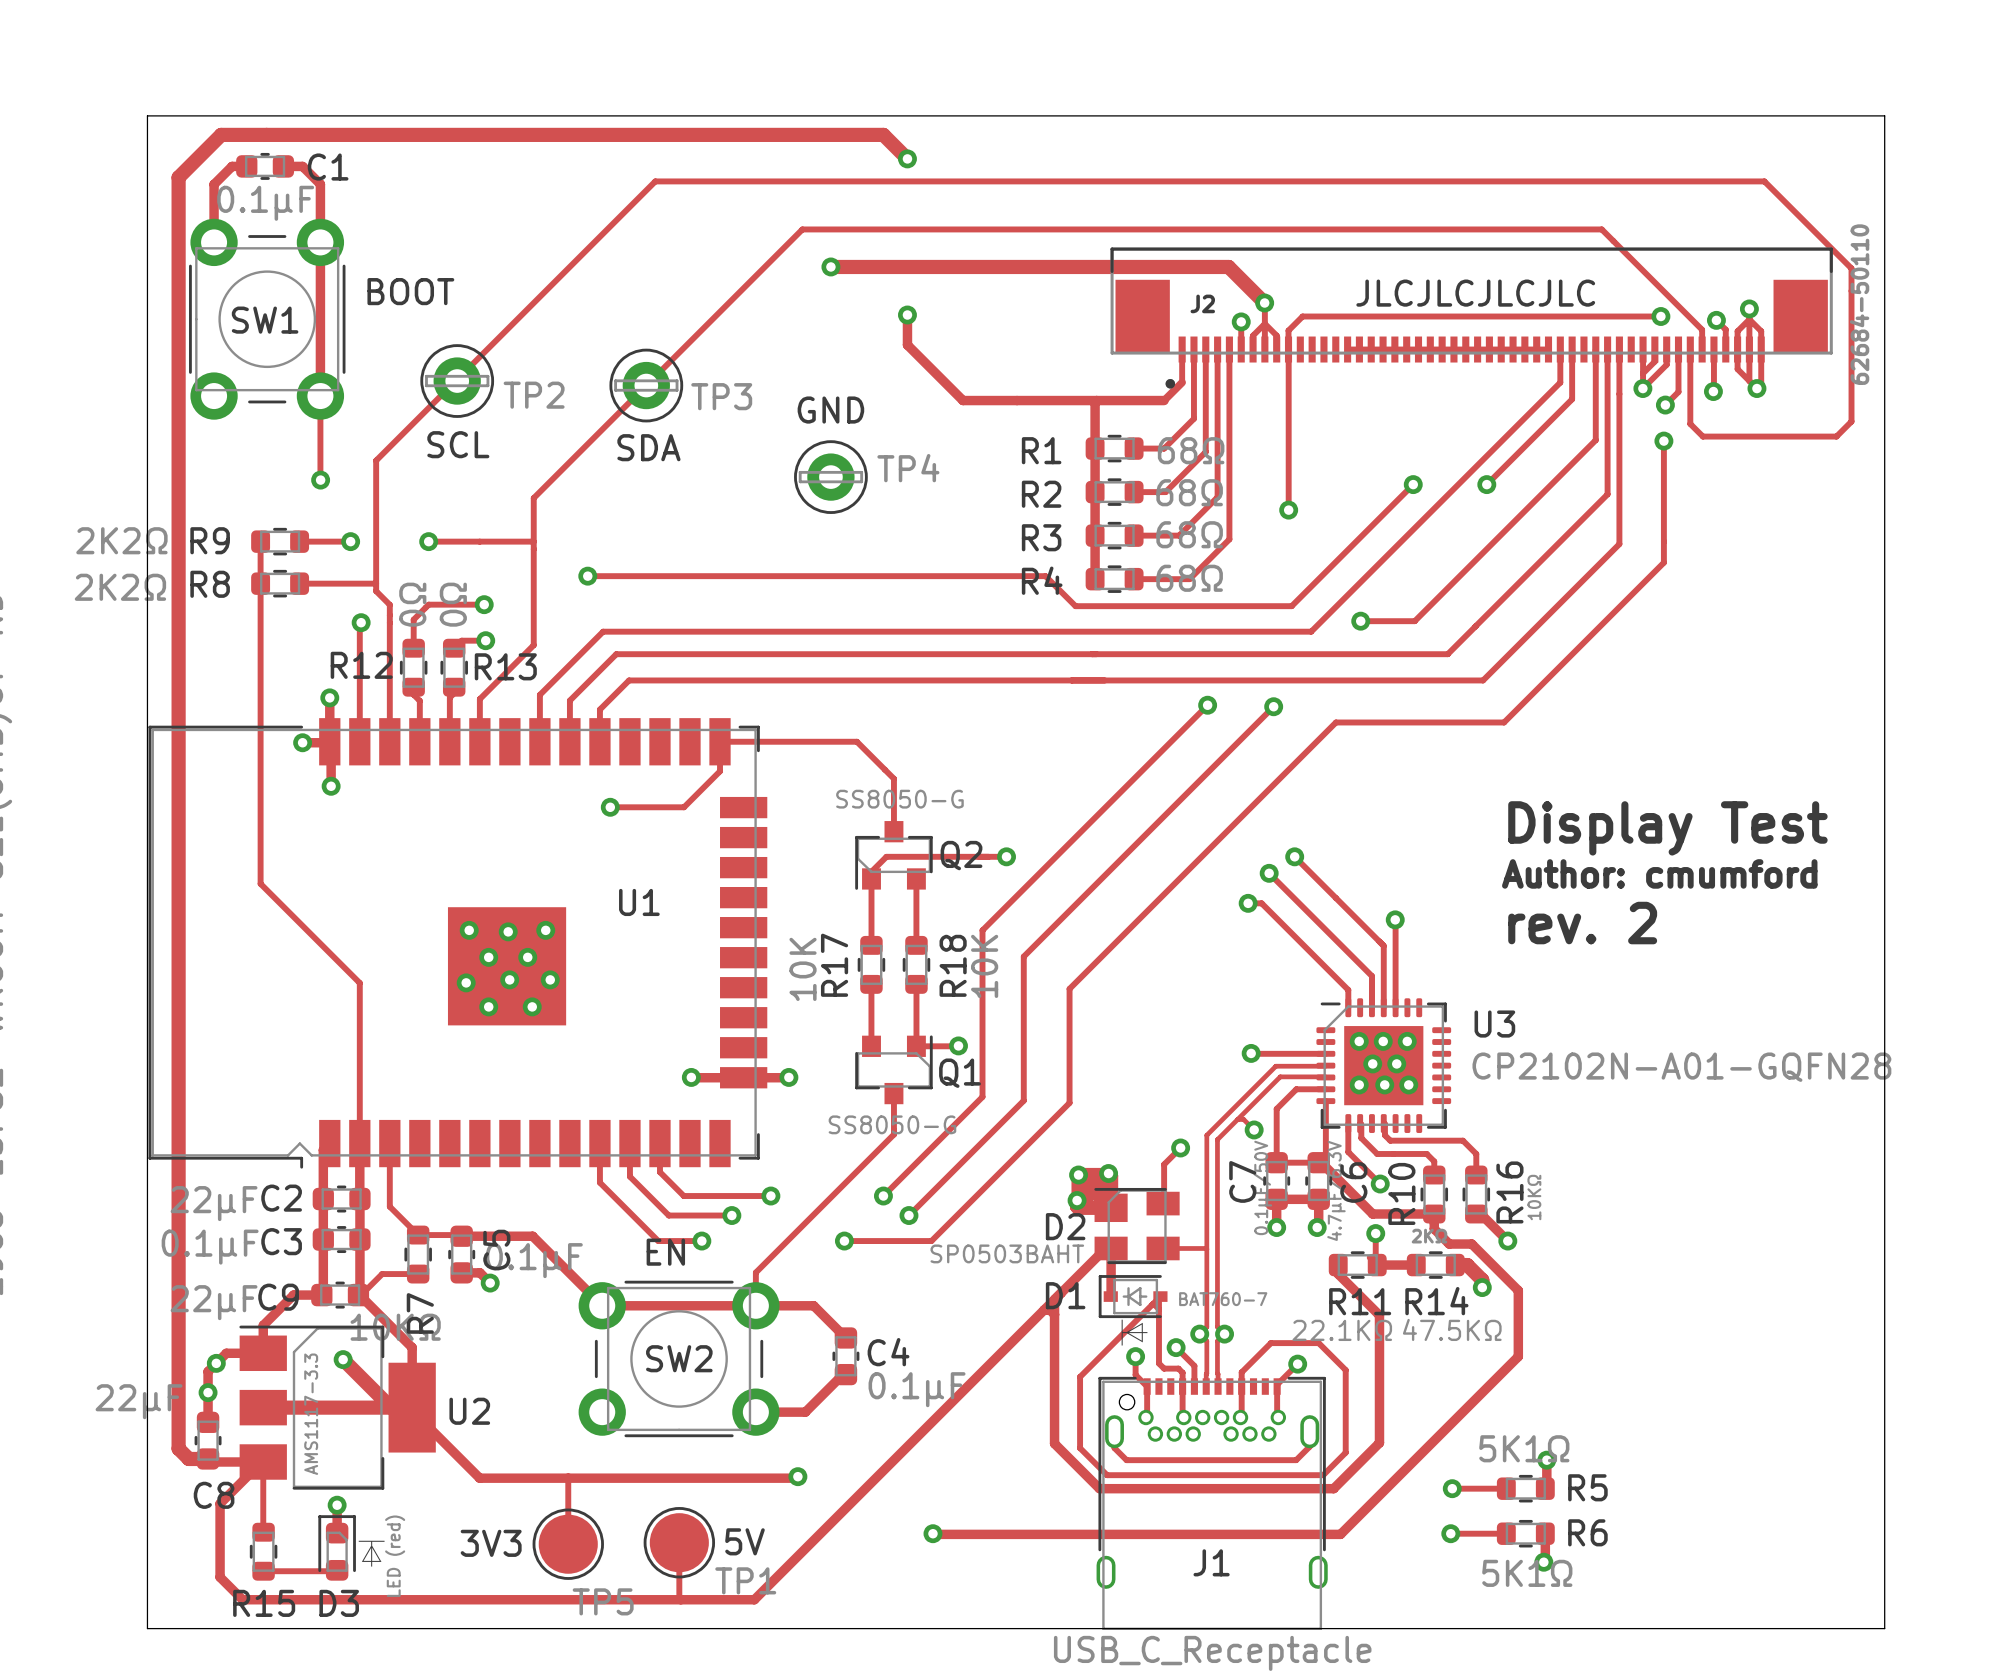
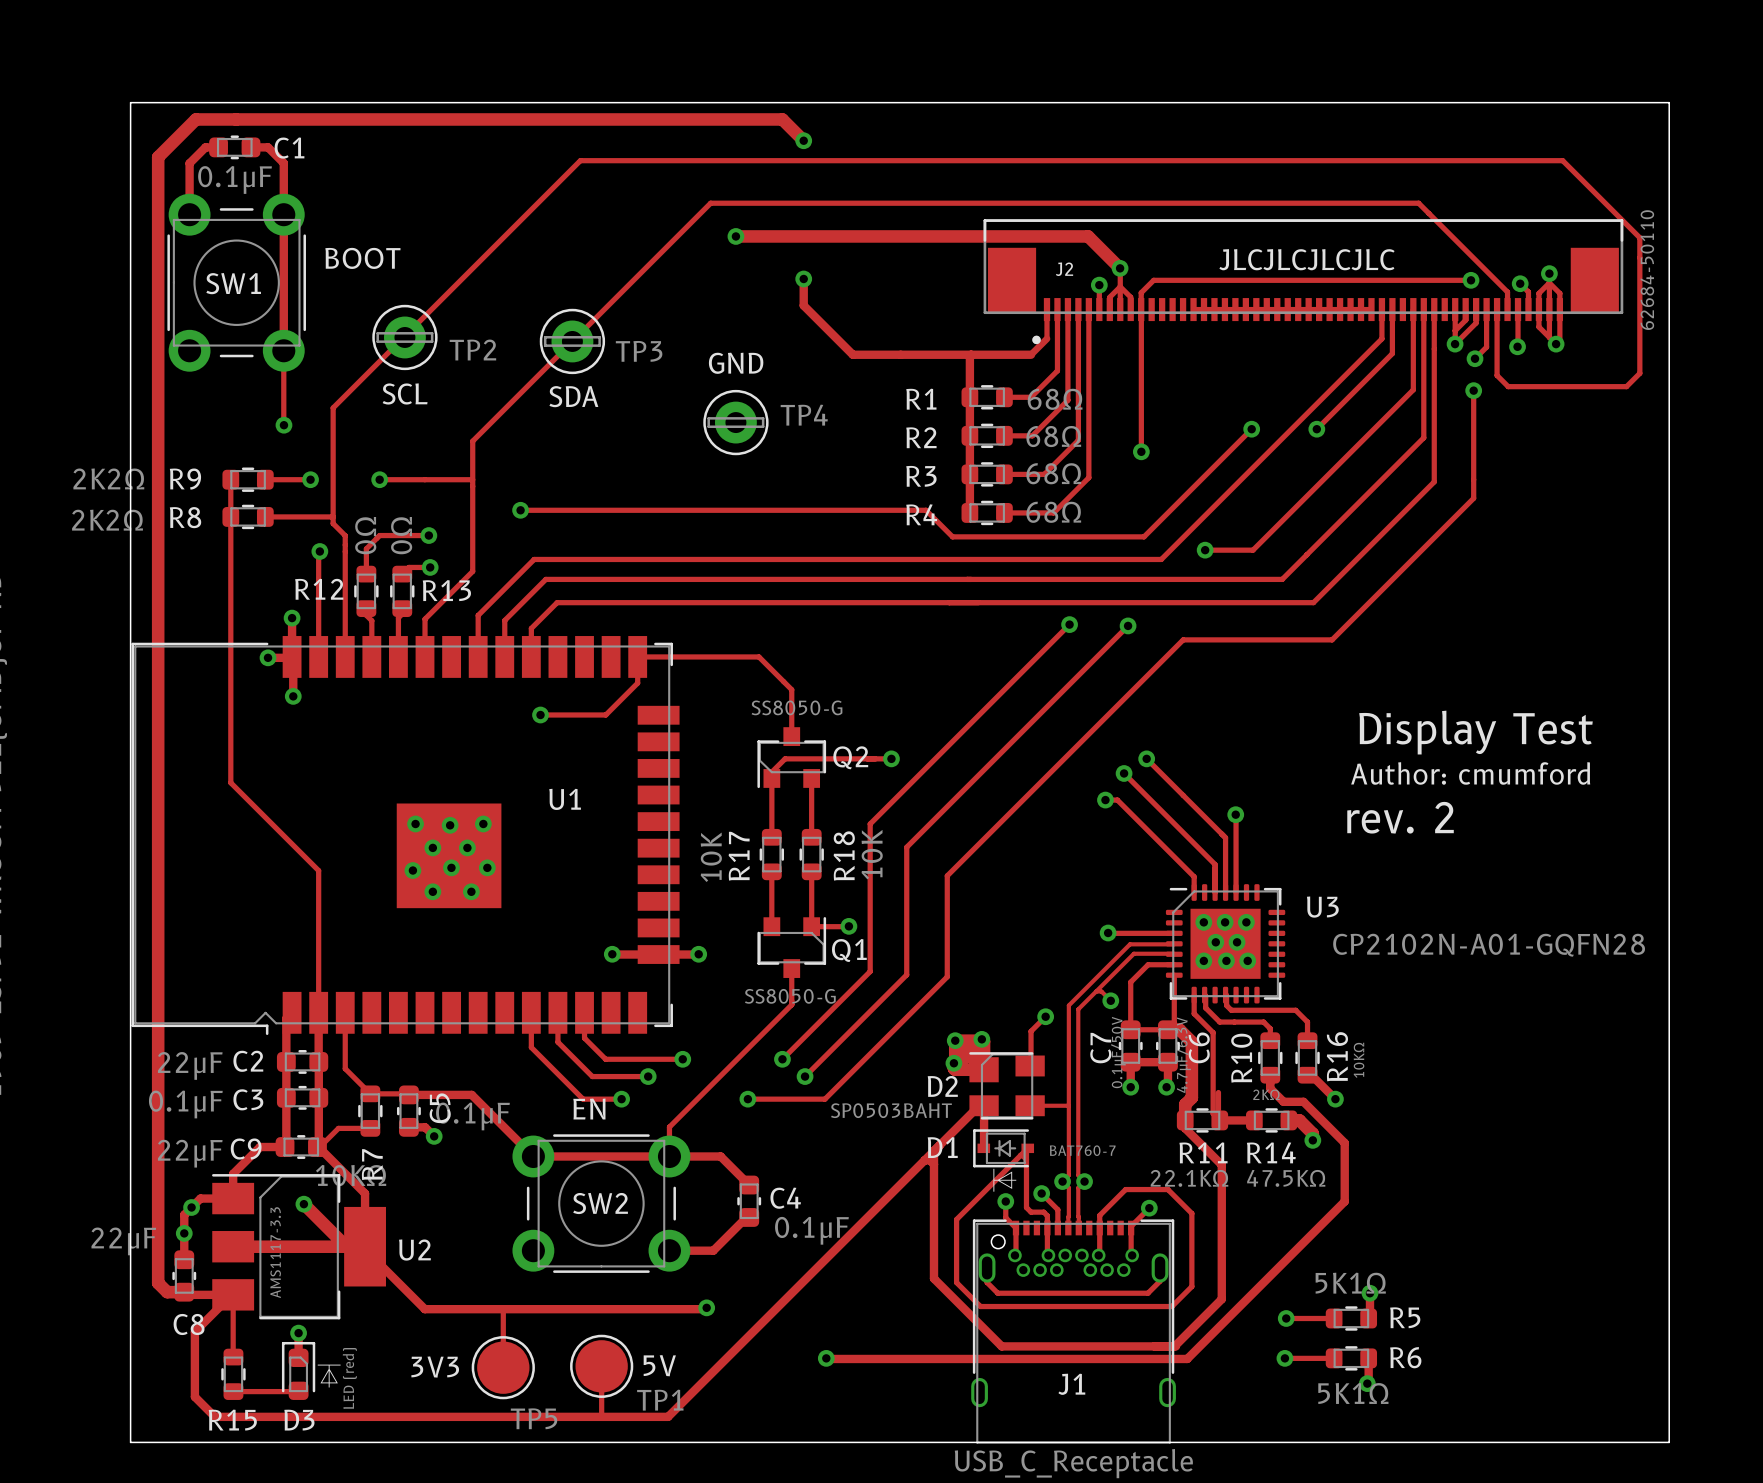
track: (1348, 1144) (1348, 1152) (1380, 1184) -> (1194, 1013) (1213, 1032) (1213, 1113)
track: (1321, 1162) (1372, 1214) (1434, 1214) -> (1170, 1029) (1179, 1029) (1191, 1042) (1191, 1097) (1185, 1104) (1185, 1120)
via: (1380, 1184) -> none
via: (1375, 1233) -> none
track: (1379, 1442) (1333, 1488) (1099, 1488) -> (1175, 1346) (1001, 1346) (973, 1318)
track: none -> (1221, 1277) (1221, 1299) (1174, 1346)

